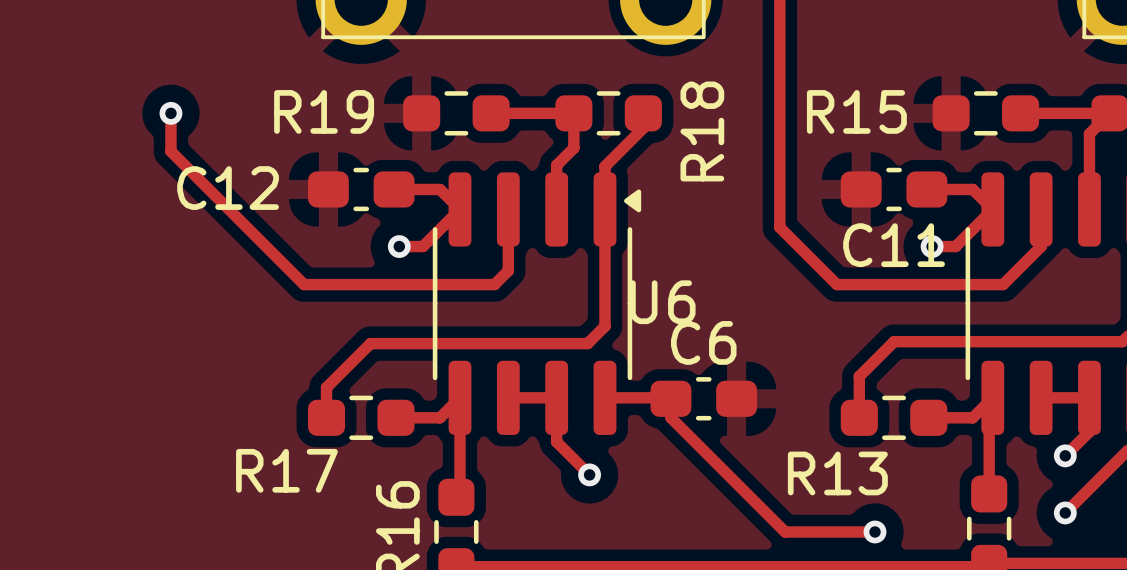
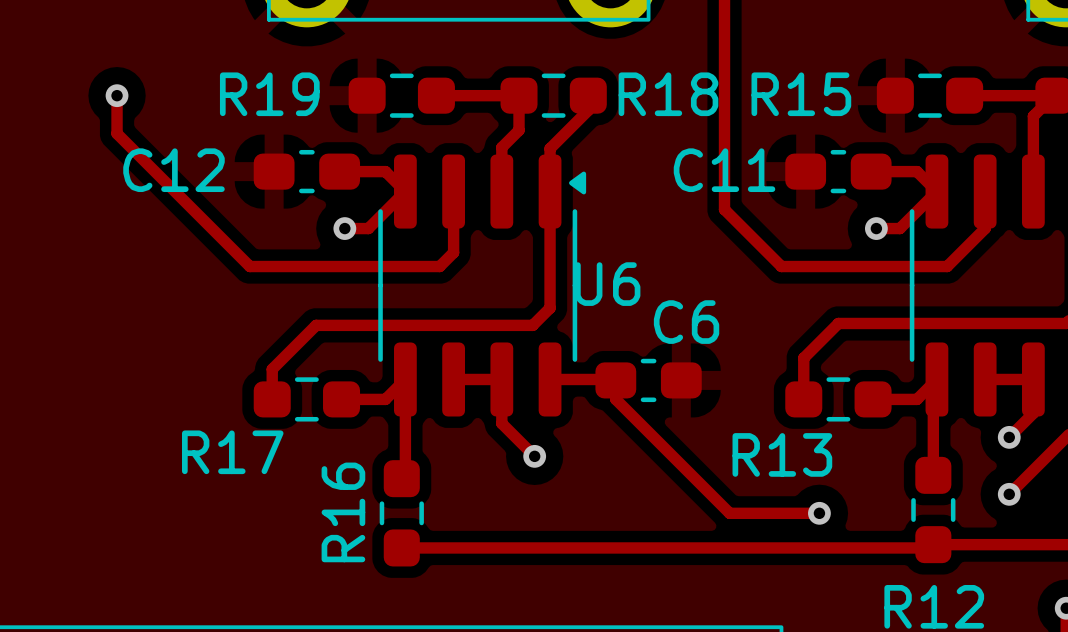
R18 name rotation: 0° (702, 131) -> 90° clockwise (668, 94)
C11 name position: C11 (894, 245) -> C11 (724, 170)
C6 name position: C6 (703, 342) -> C6 (686, 322)

